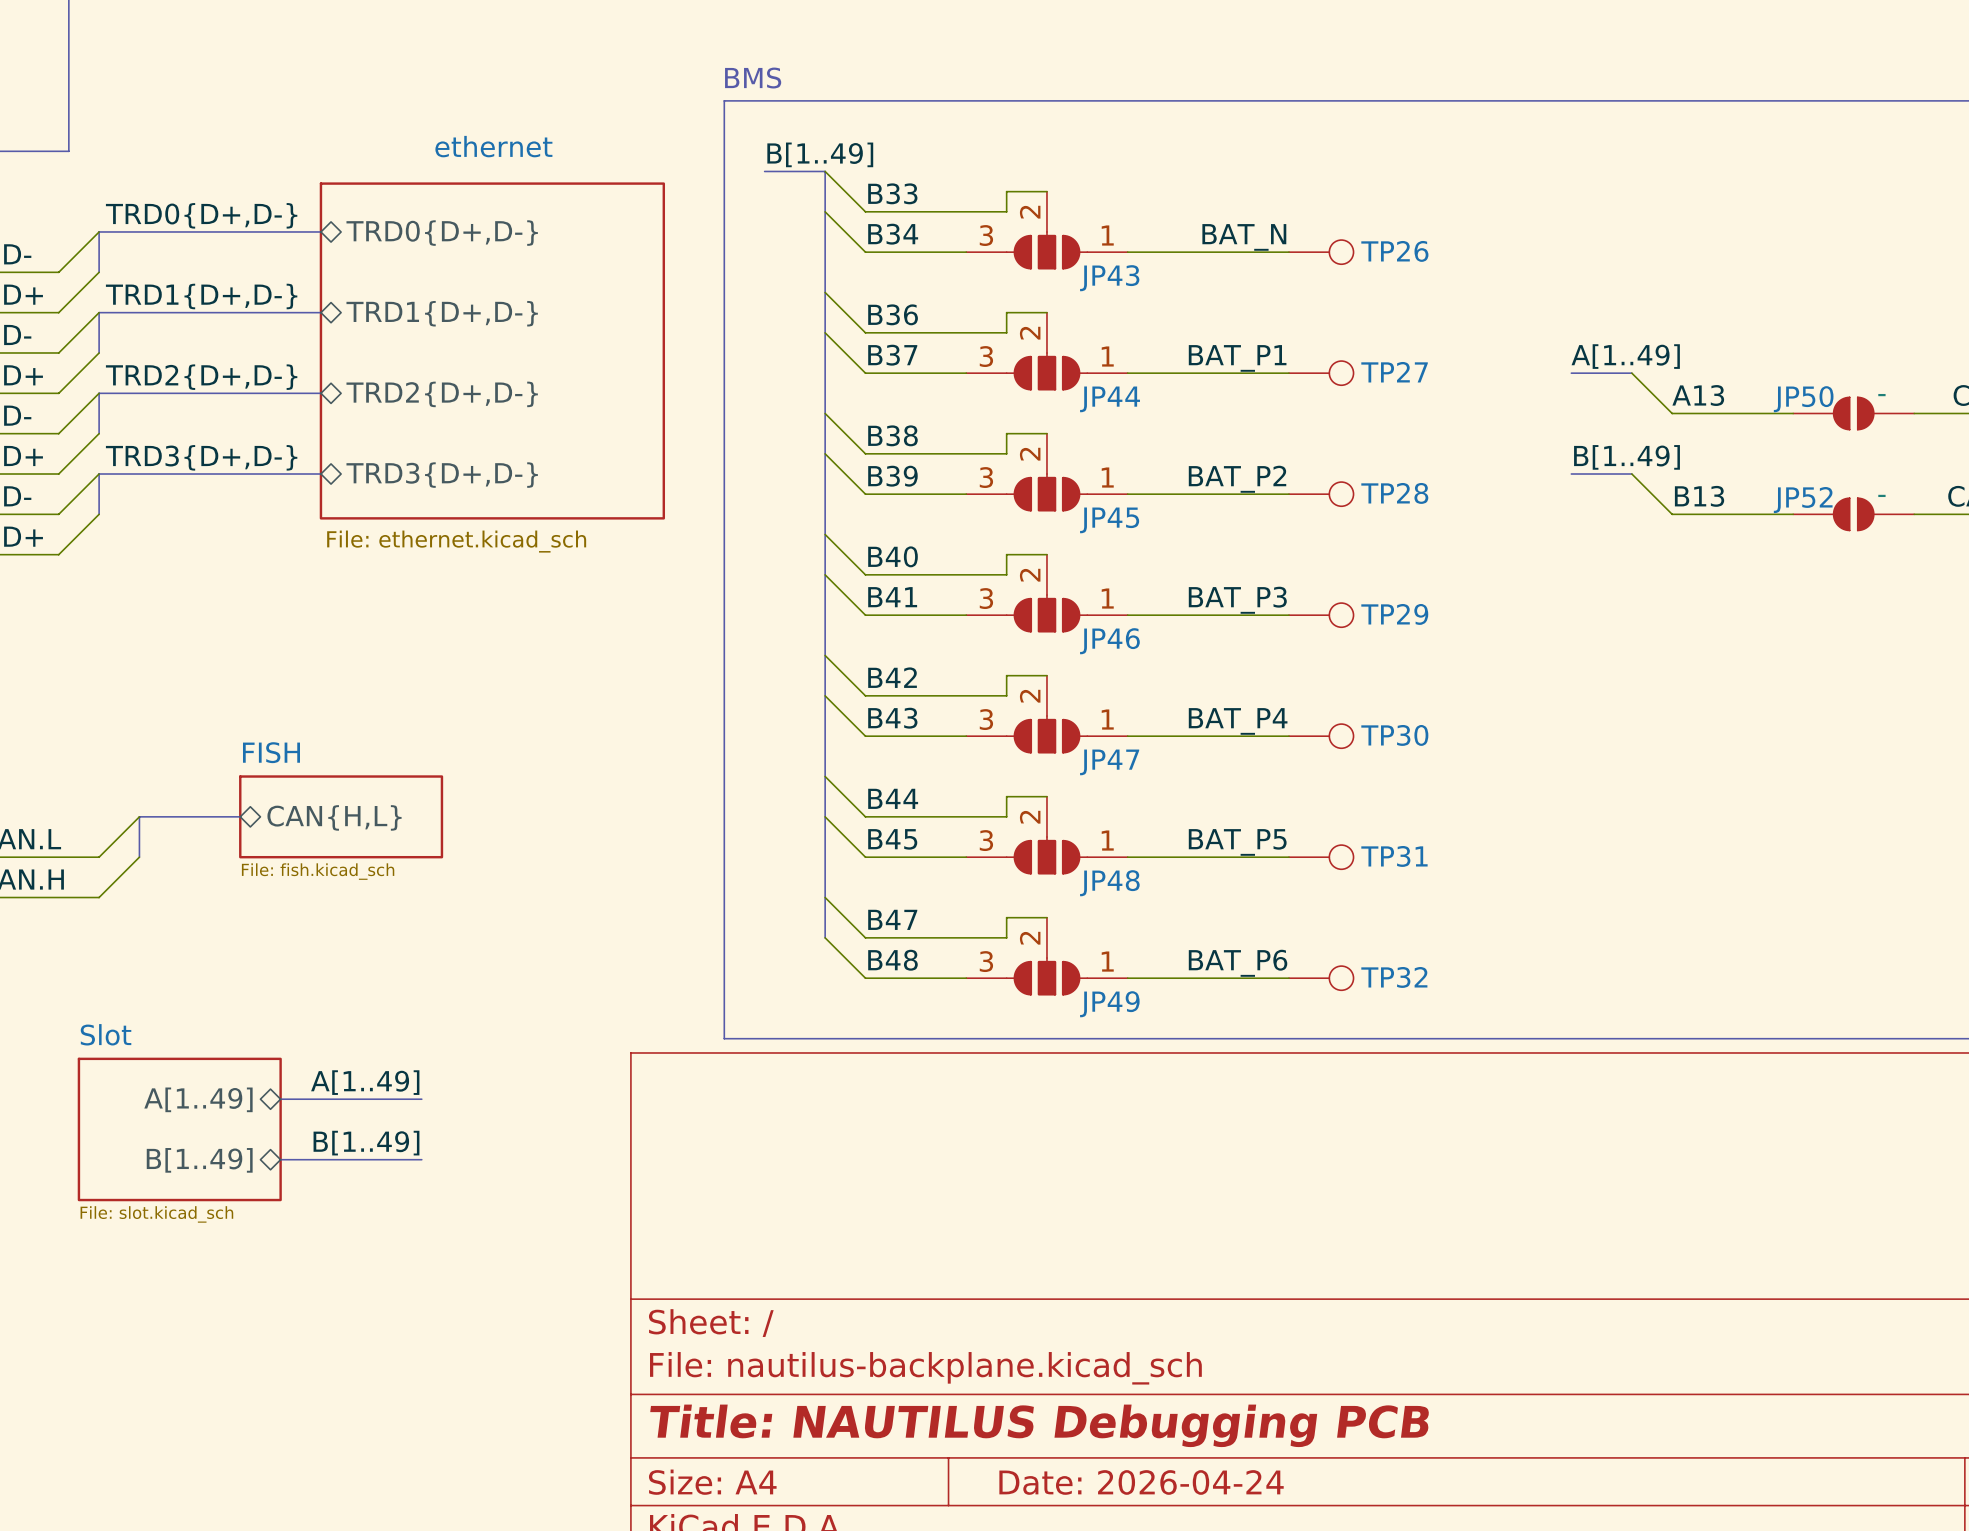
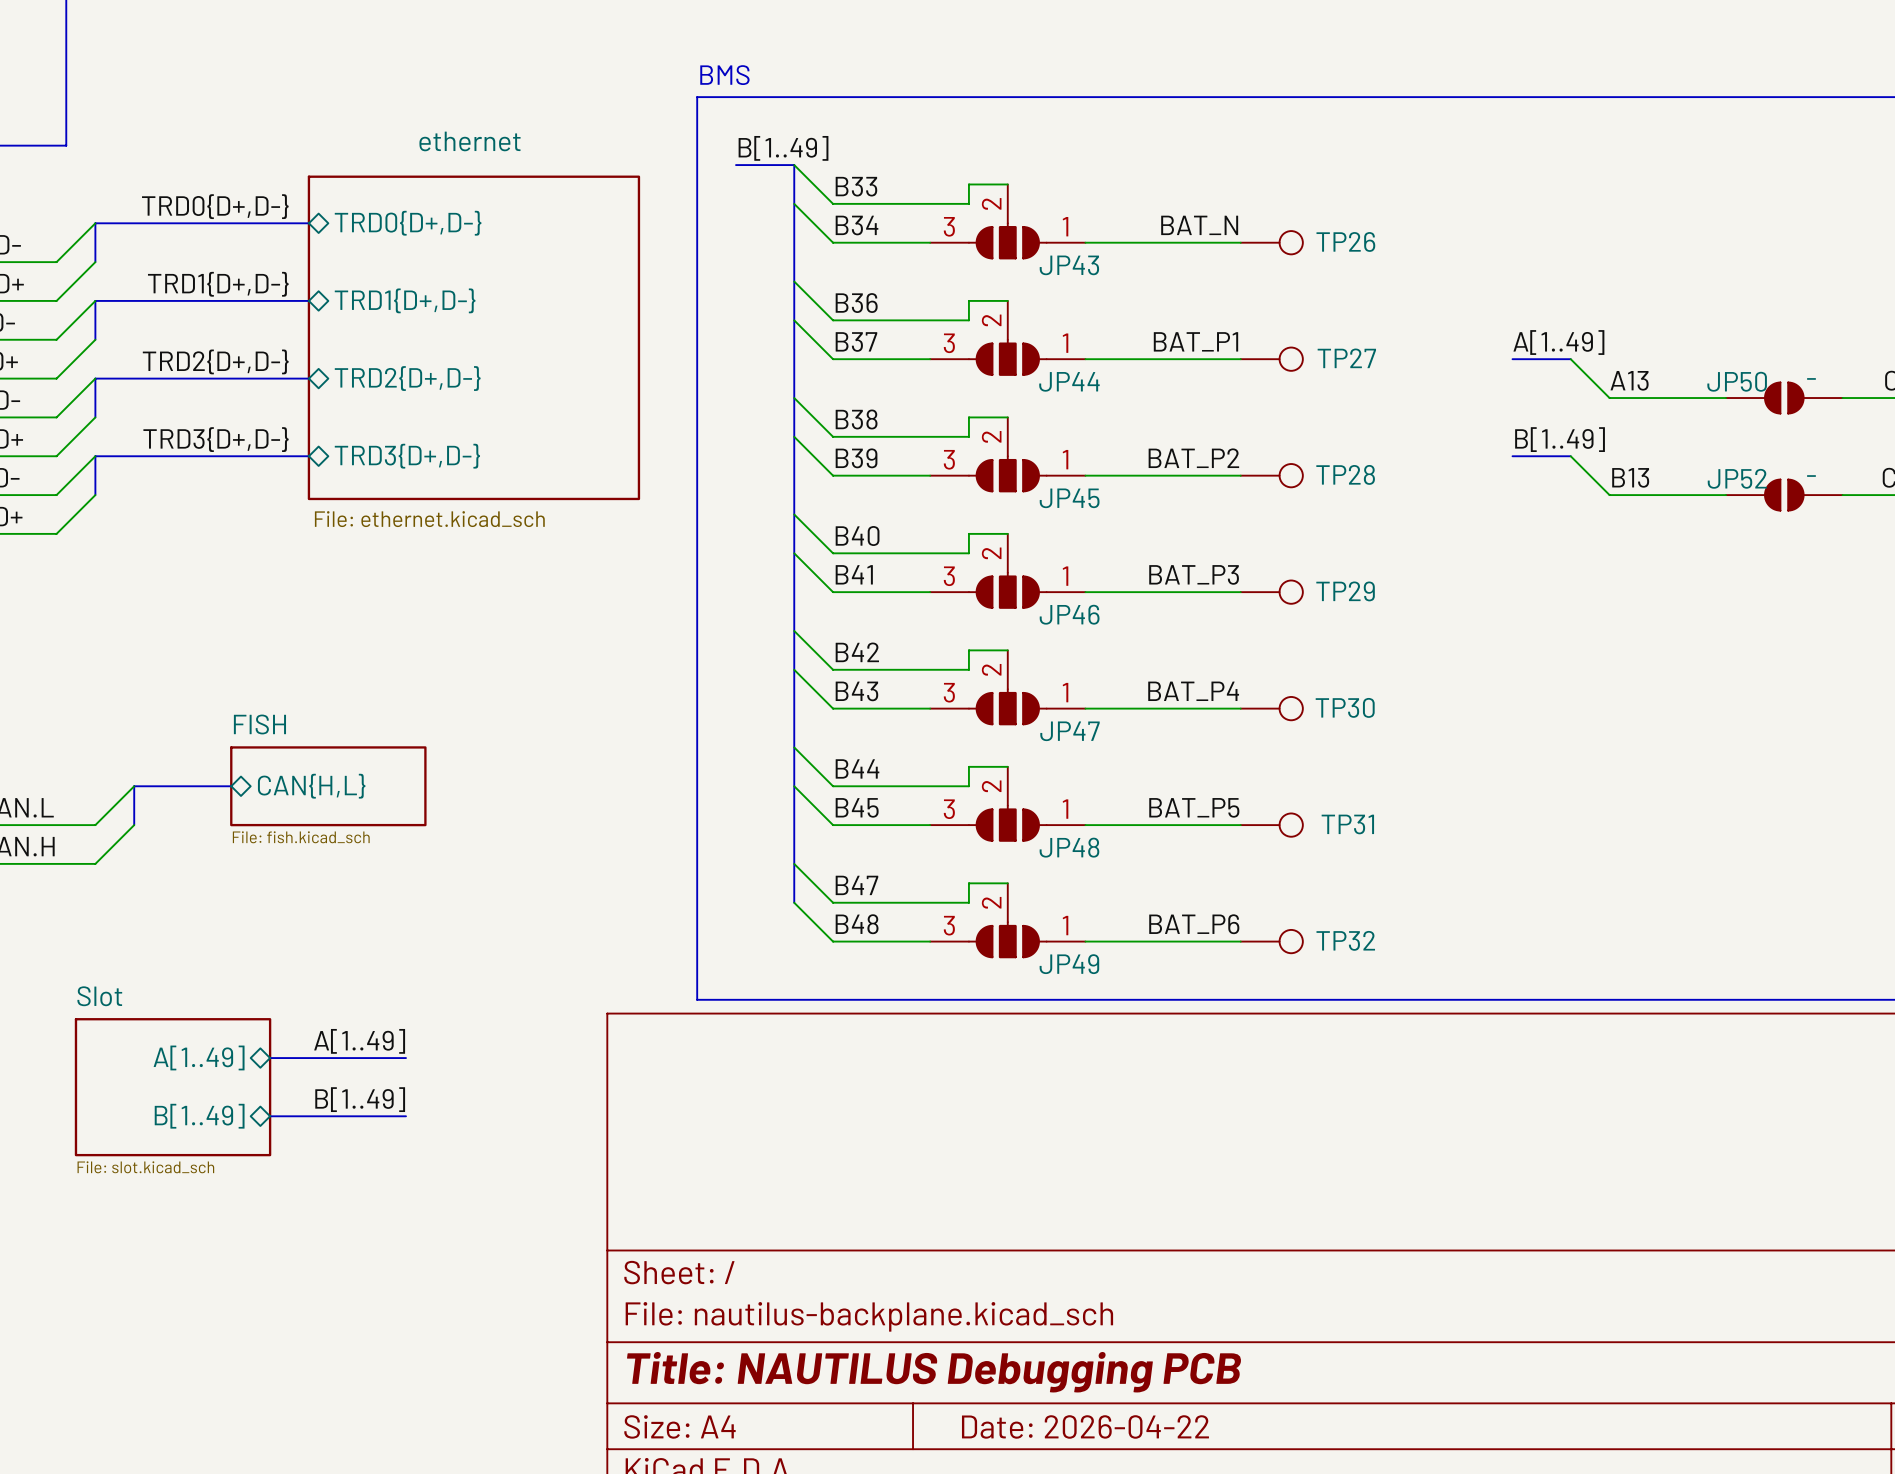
title block: Date: 2026-04-24 (1141, 1482) -> Date: 2026-04-22 (1085, 1426)

